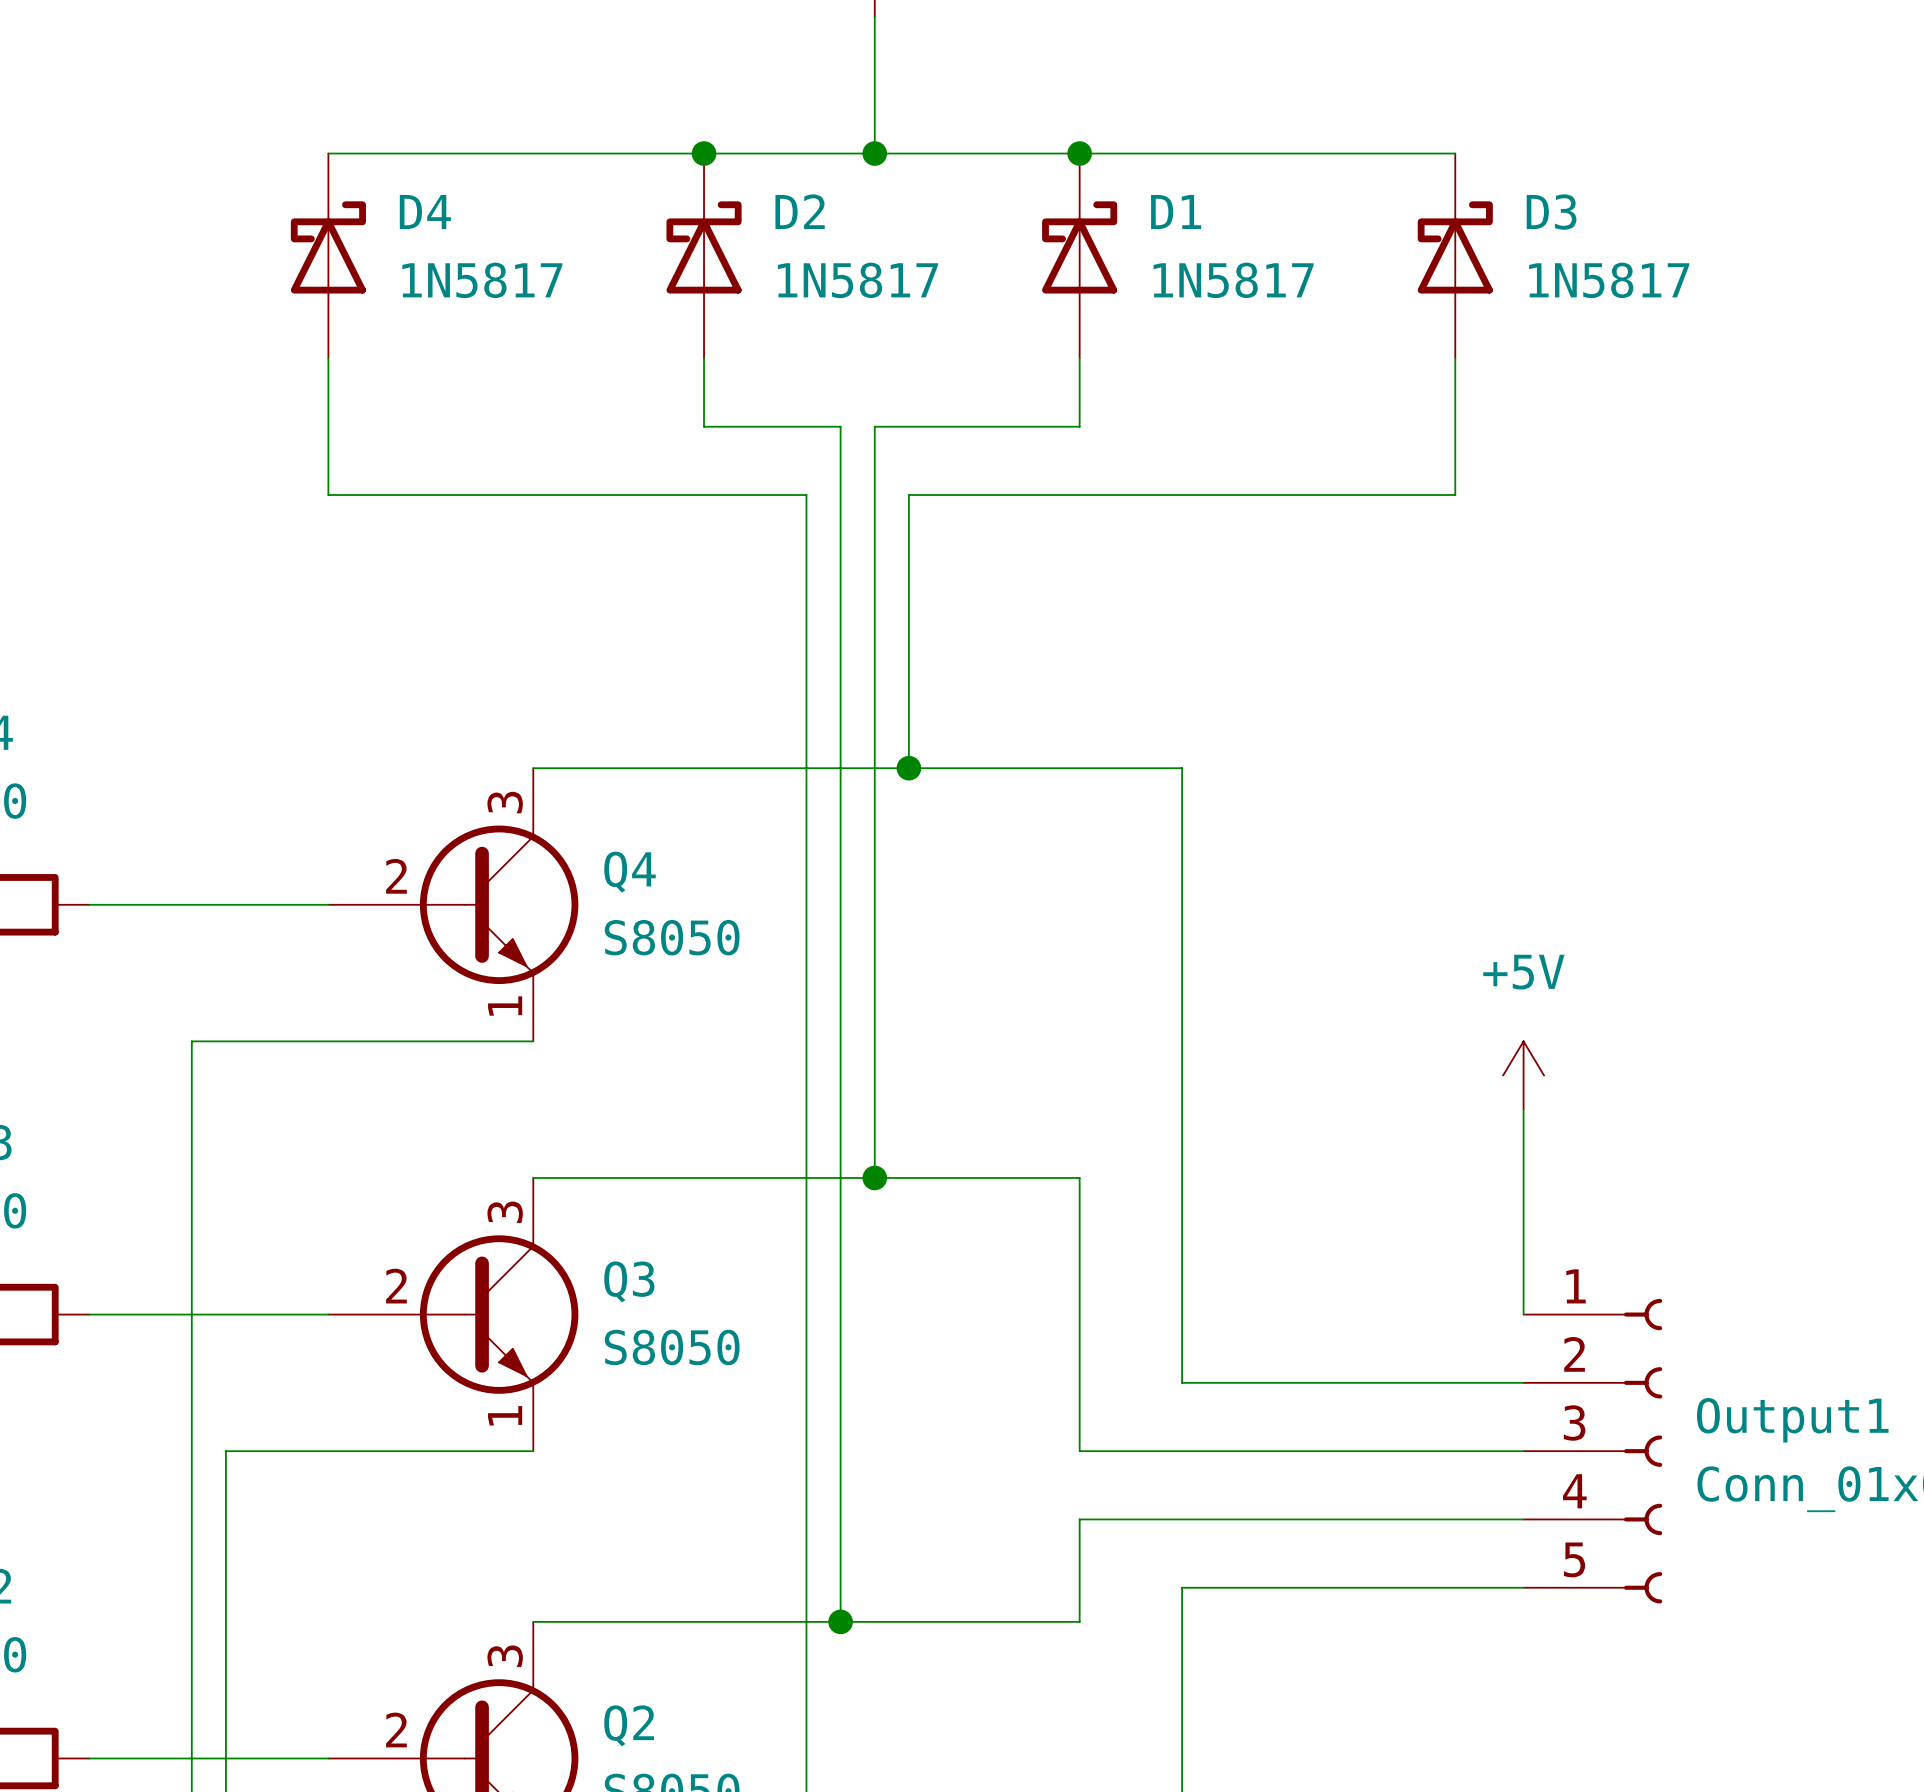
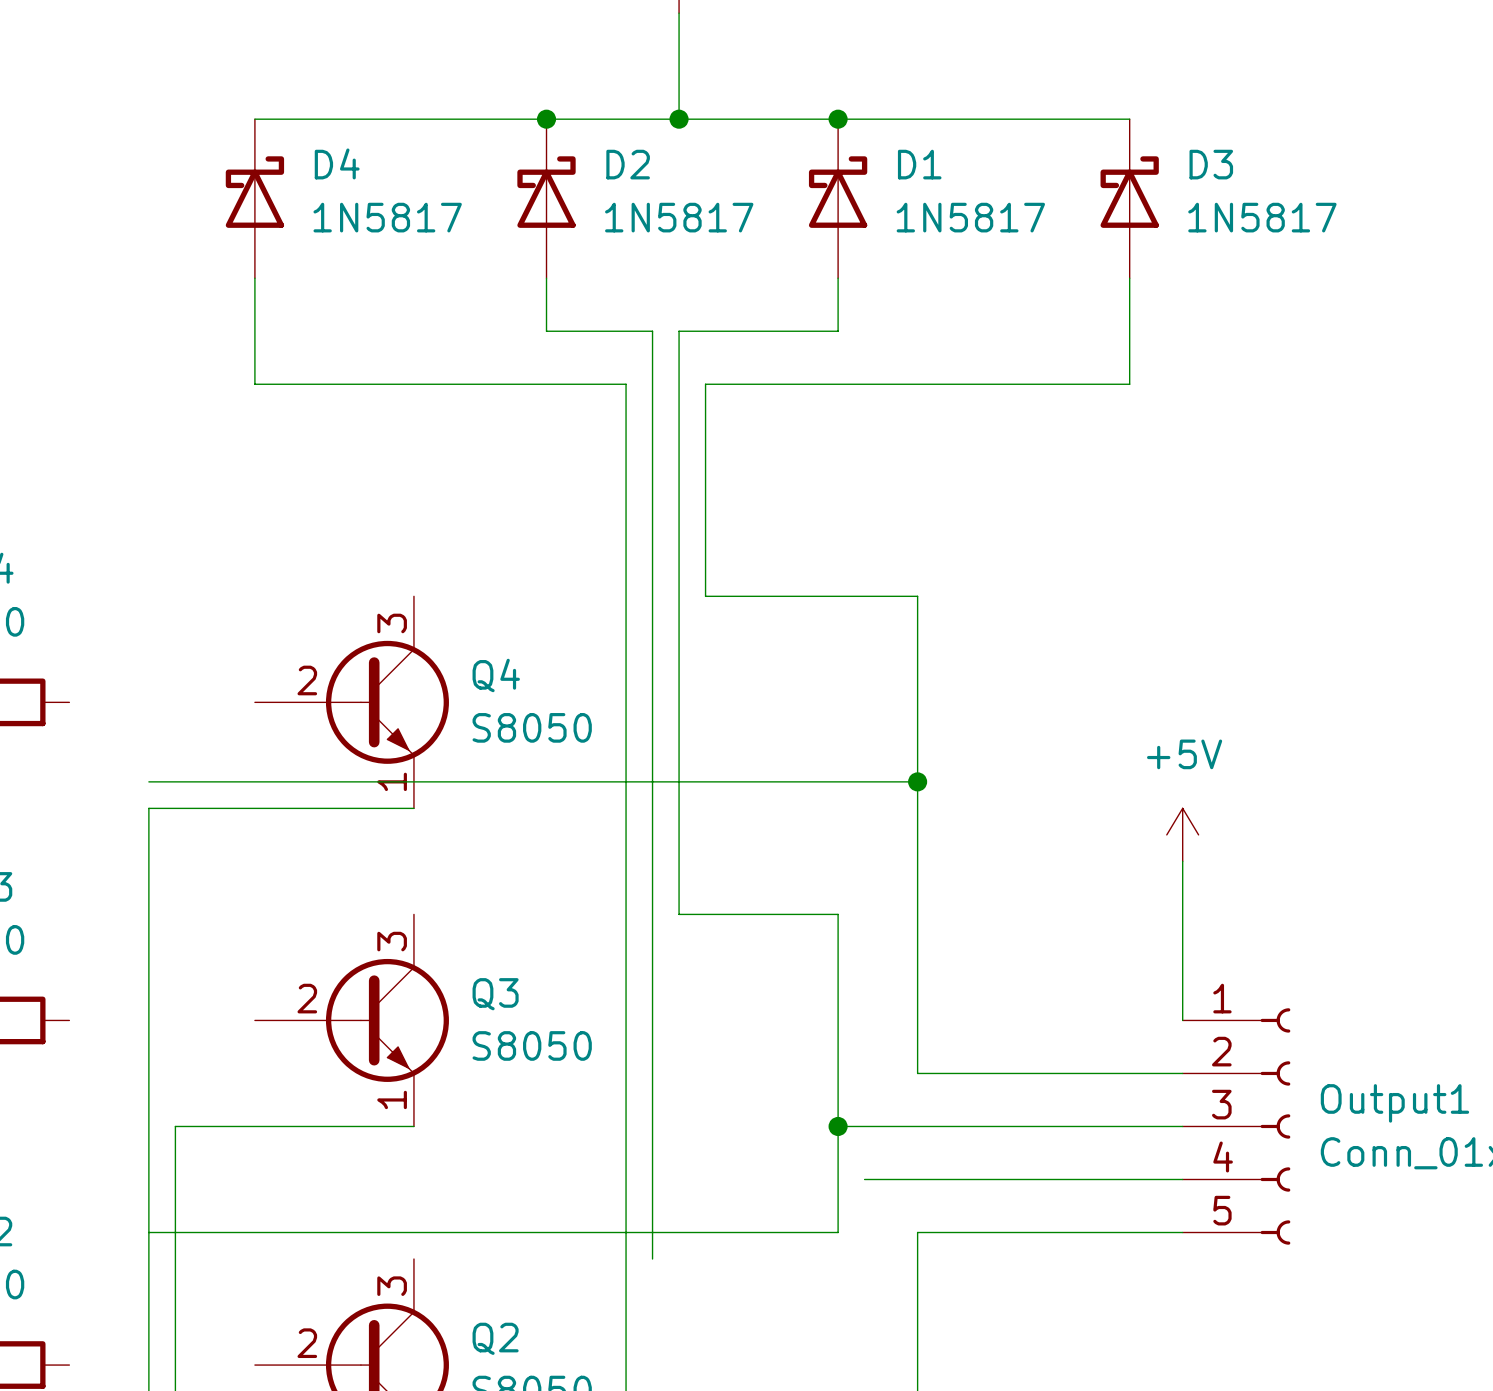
wire: (533, 768) (908, 768) -> none
junction: (908, 768) -> none
wire: (89, 904) (328, 904) -> none
wire: none -> (148, 781) (917, 781)
junction: none -> (917, 781)
wire: (533, 1177) (874, 1177) -> none
junction: (874, 1177) -> none
wire: (89, 1314) (328, 1314) -> none
junction: none -> (838, 1126)
wire: (1079, 1519) (1113, 1519) -> (838, 1179) (838, 1126)
wire: (1079, 1587) (1079, 1621) (533, 1621) -> (838, 1232) (148, 1232)
junction: (840, 1621) -> none
wire: (89, 1758) (328, 1758) -> none

